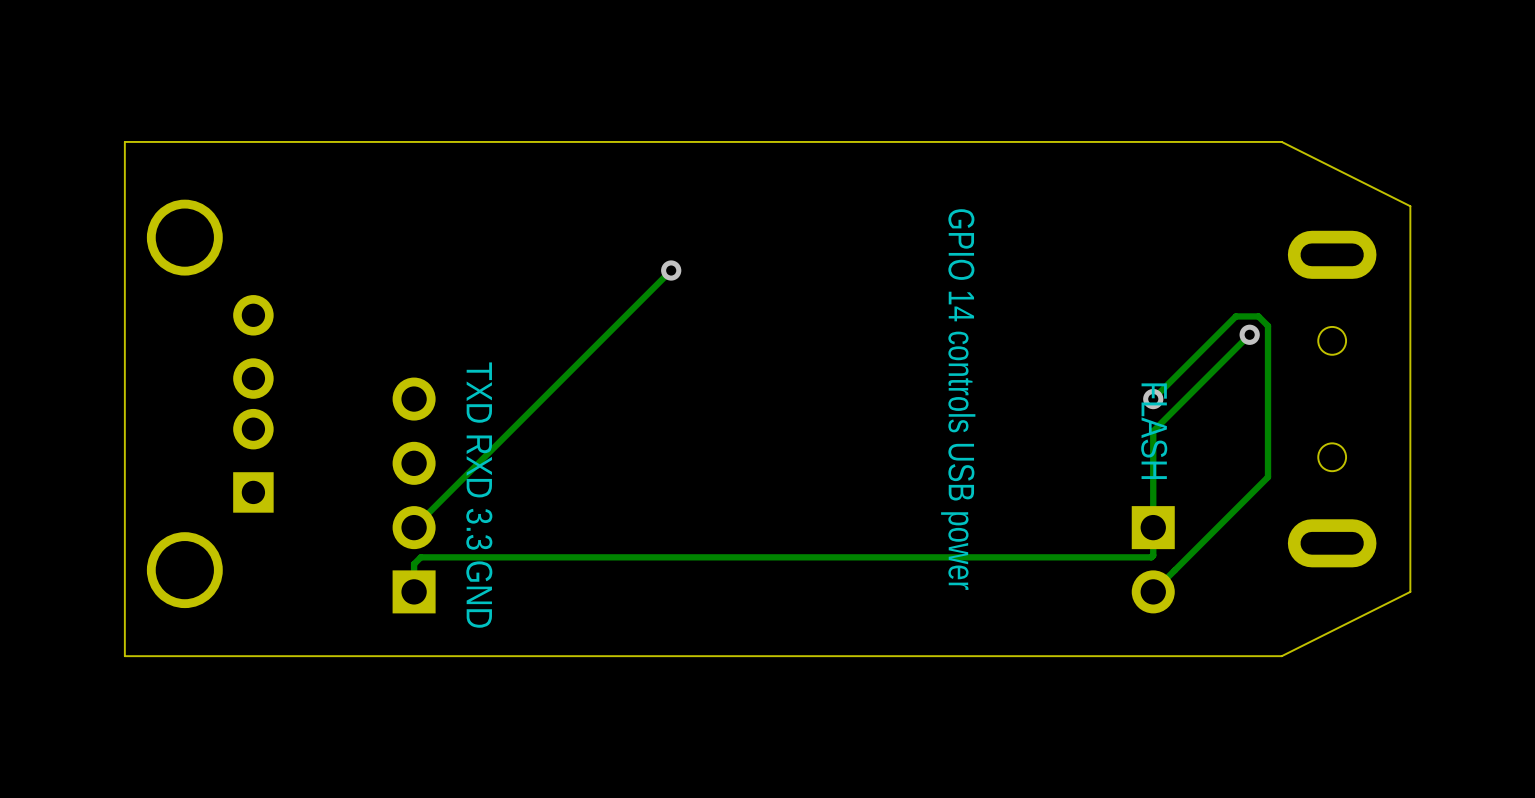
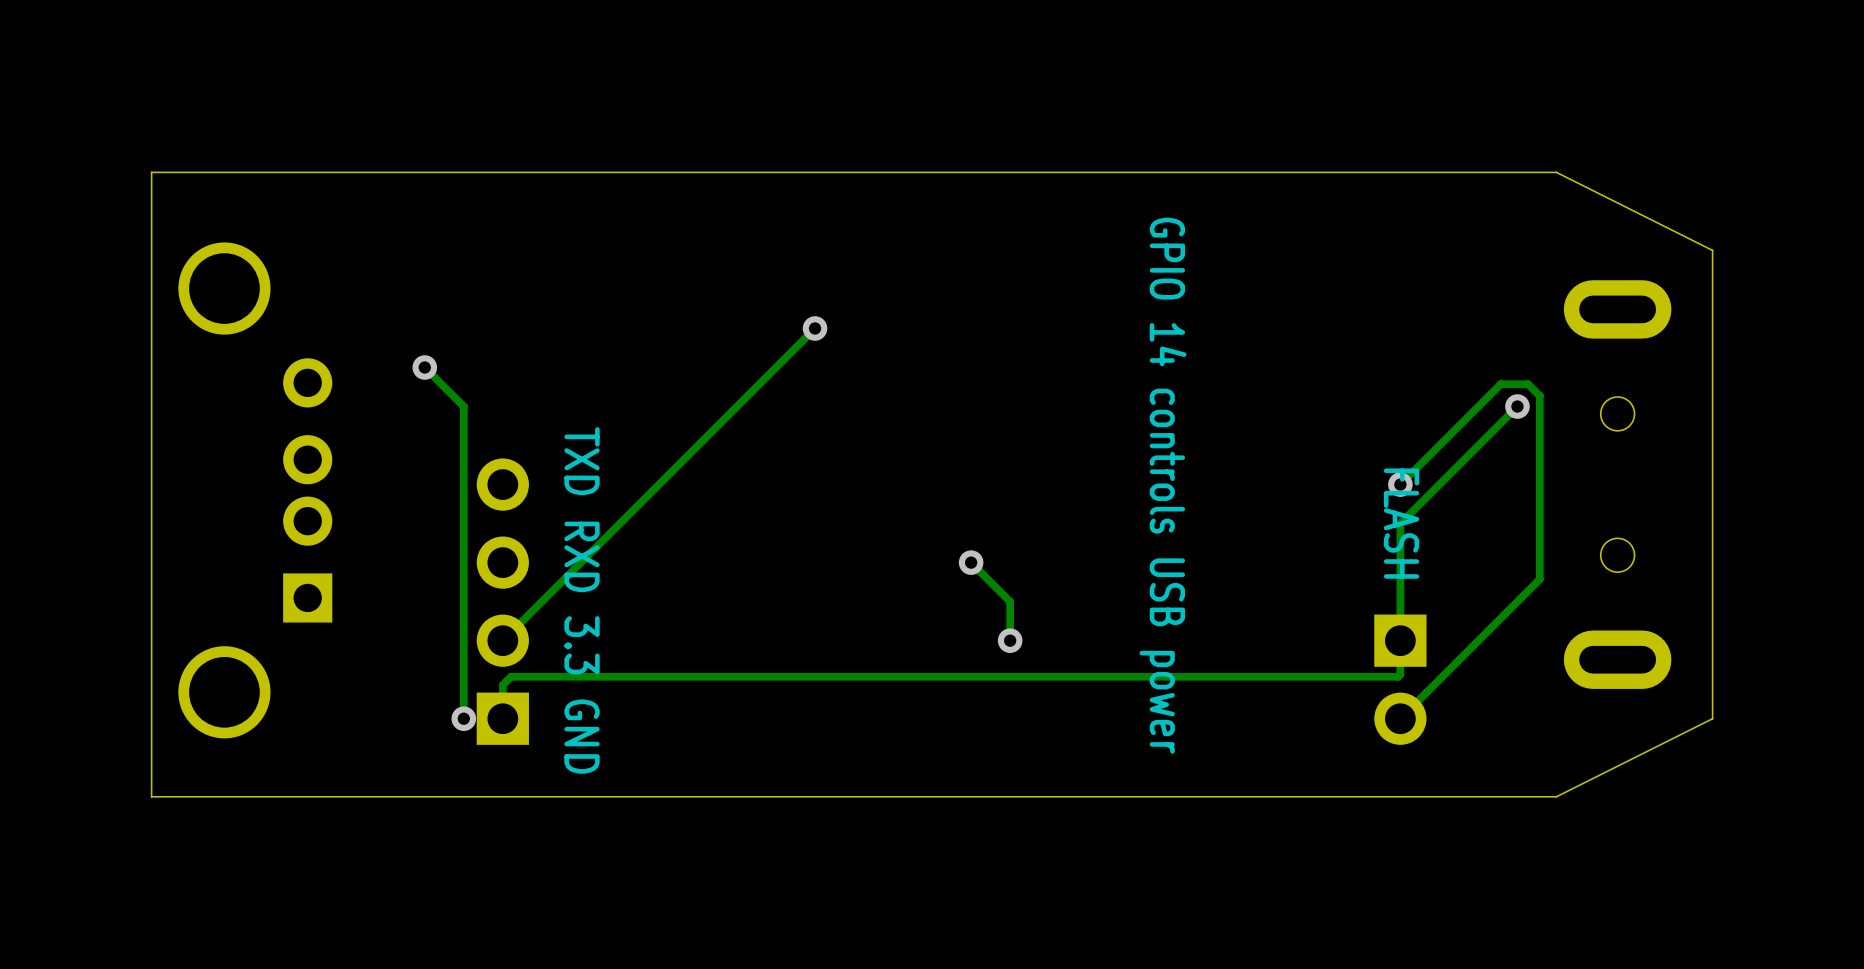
track: none -> (424, 367) (463, 406) (463, 718)
via: none -> (424, 367)
track: none -> (971, 562) (1010, 601) (1010, 640)
via: none -> (971, 562)
via: none -> (1010, 640)
via: none -> (463, 718)

